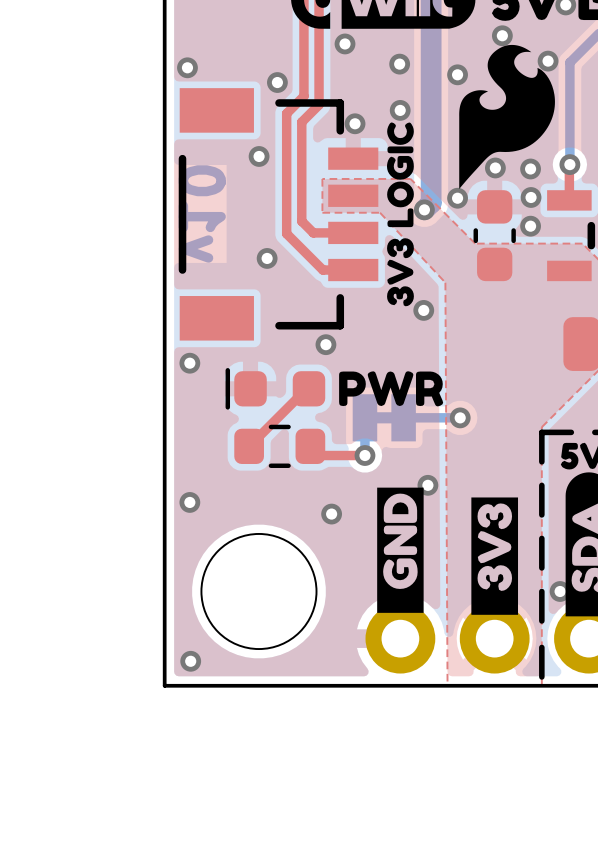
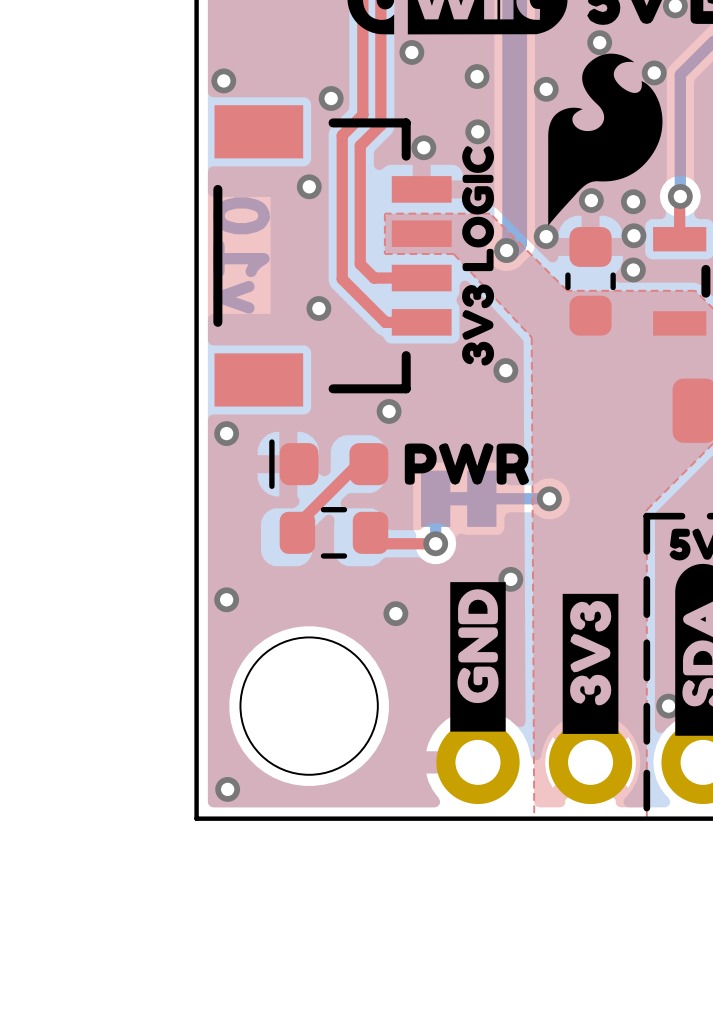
top track: none -> (358, 464) (286, 537)
top track: (310, 388) (307, 388) (250, 445) -> none

